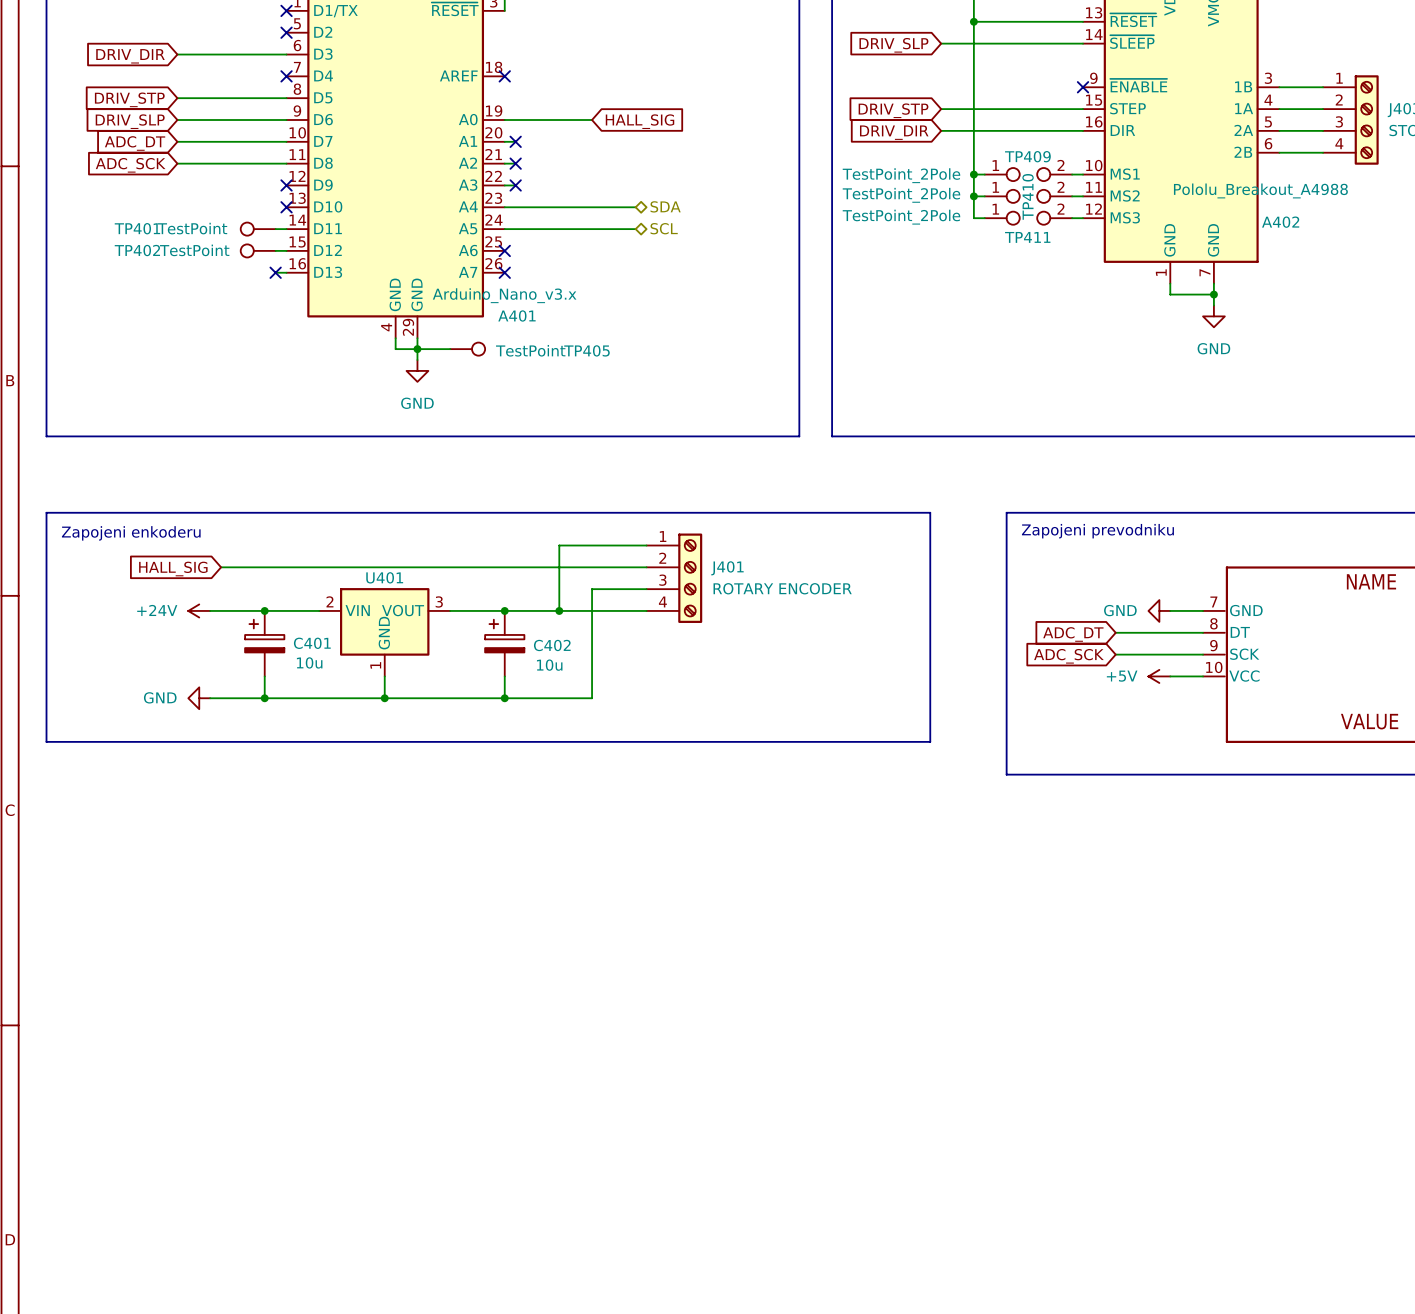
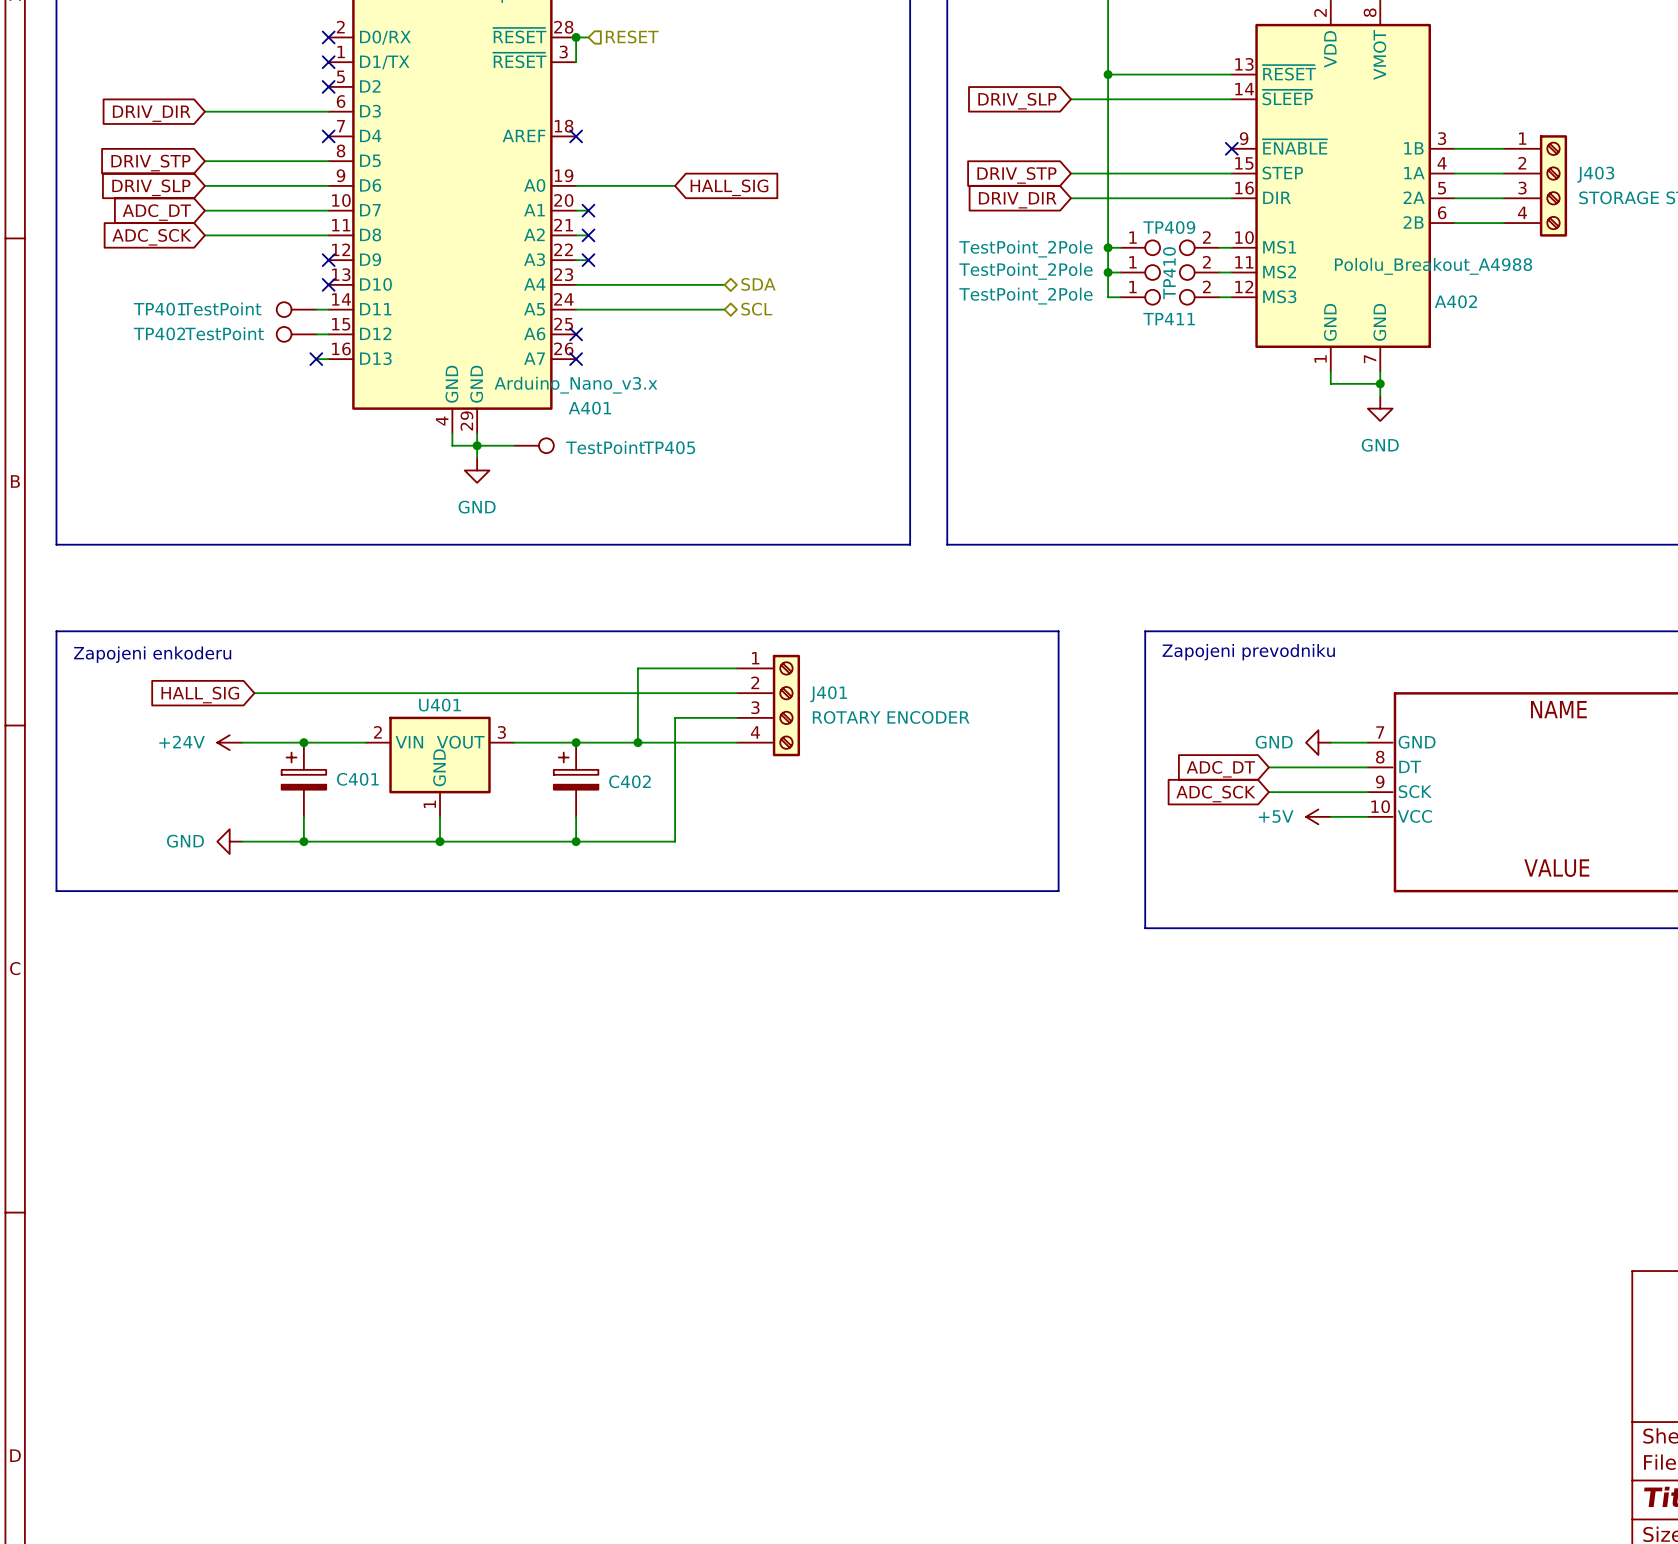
C401 value: 10u (309, 662) -> none
C402 value: 10u (549, 665) -> none

